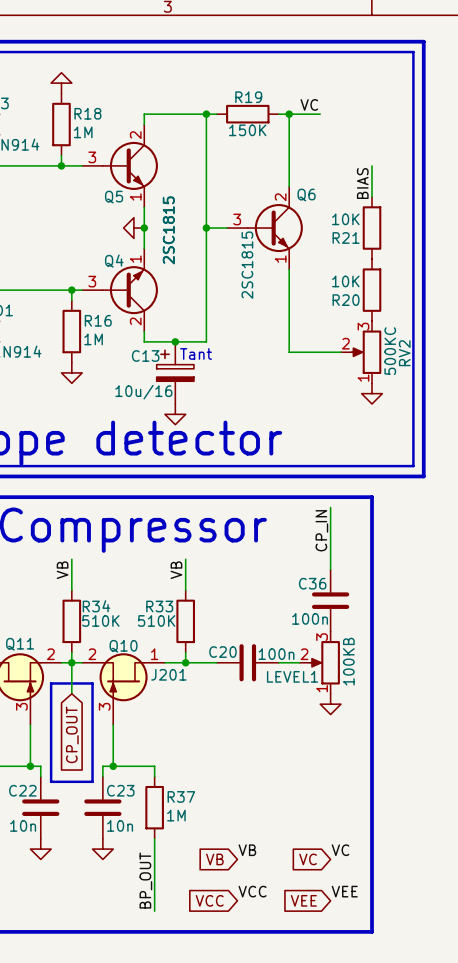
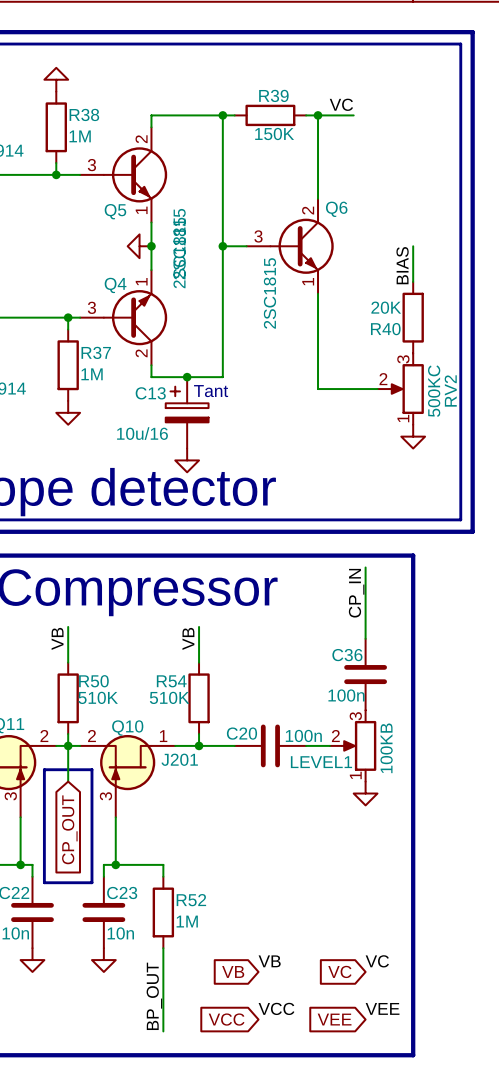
R19 name: R19 (248, 97) -> R39 (273, 95)
R18 name: R18 (87, 113) -> R38 (84, 114)
wire: (372, 165) (372, 196) -> (413, 246) (413, 281)
label position: BIAS (362, 183) -> BIAS (402, 265)
R21: 10K (372, 228) -> none
R20 value: 10K (345, 281) -> 20K (386, 307)
R20 name: R20 (346, 300) -> R40 (385, 329)
R16 name: R16 (98, 320) -> R37 (96, 352)
R34 name: R34 (96, 606) -> R50 (93, 681)
R33 name: R33 (159, 606) -> R54 (171, 681)
R37 name: R37 (181, 796) -> R52 (191, 900)

